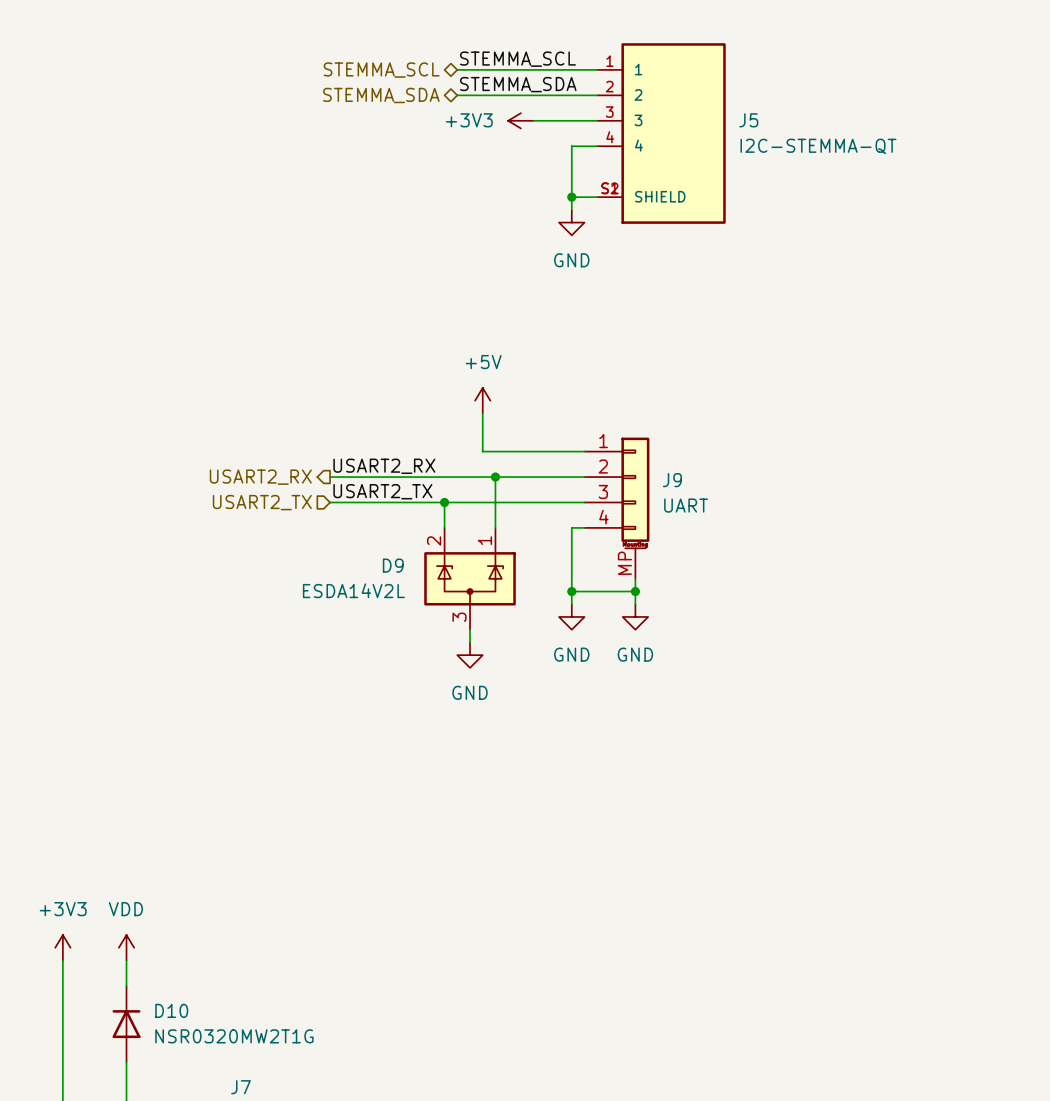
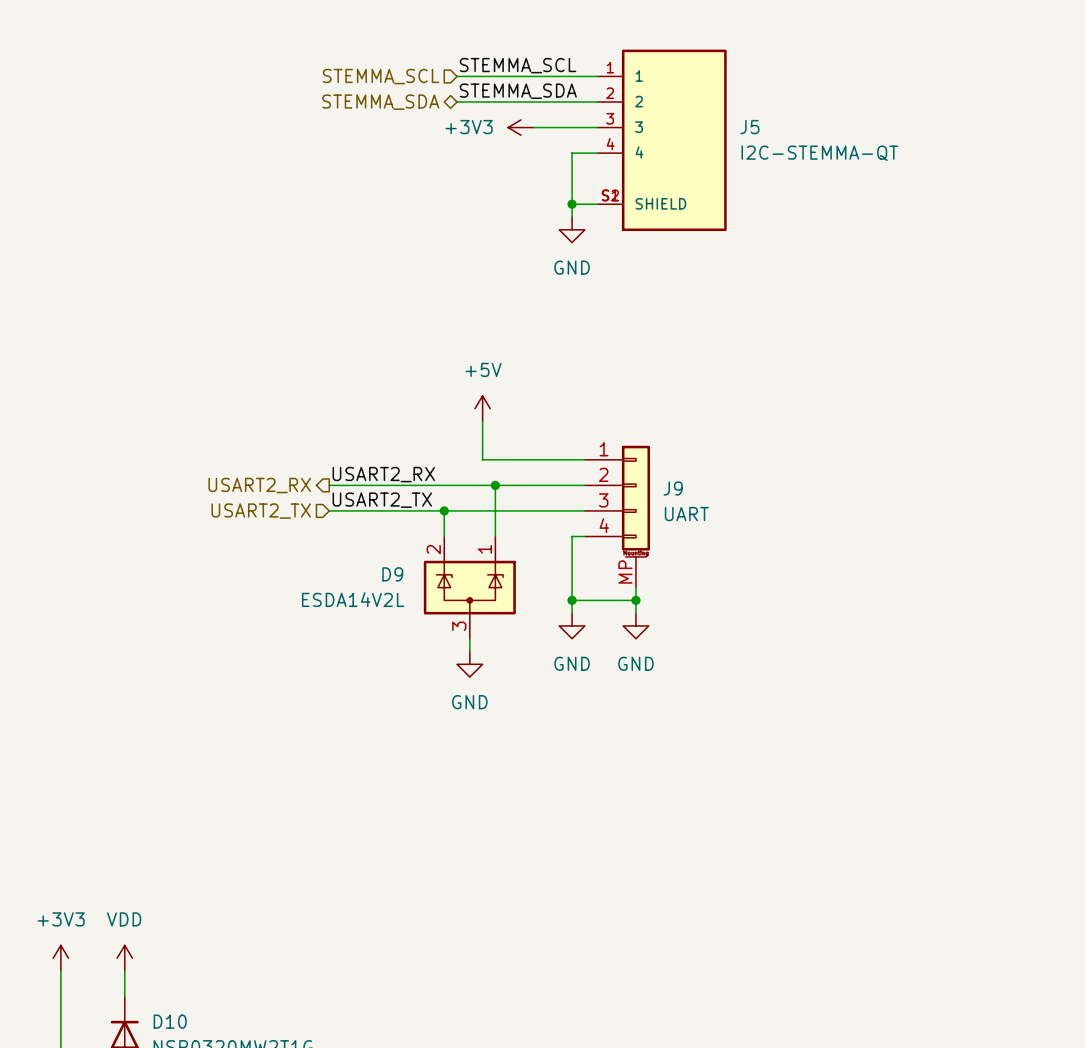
hierarchical label shape: bidirectional (381, 70) -> input (381, 76)

